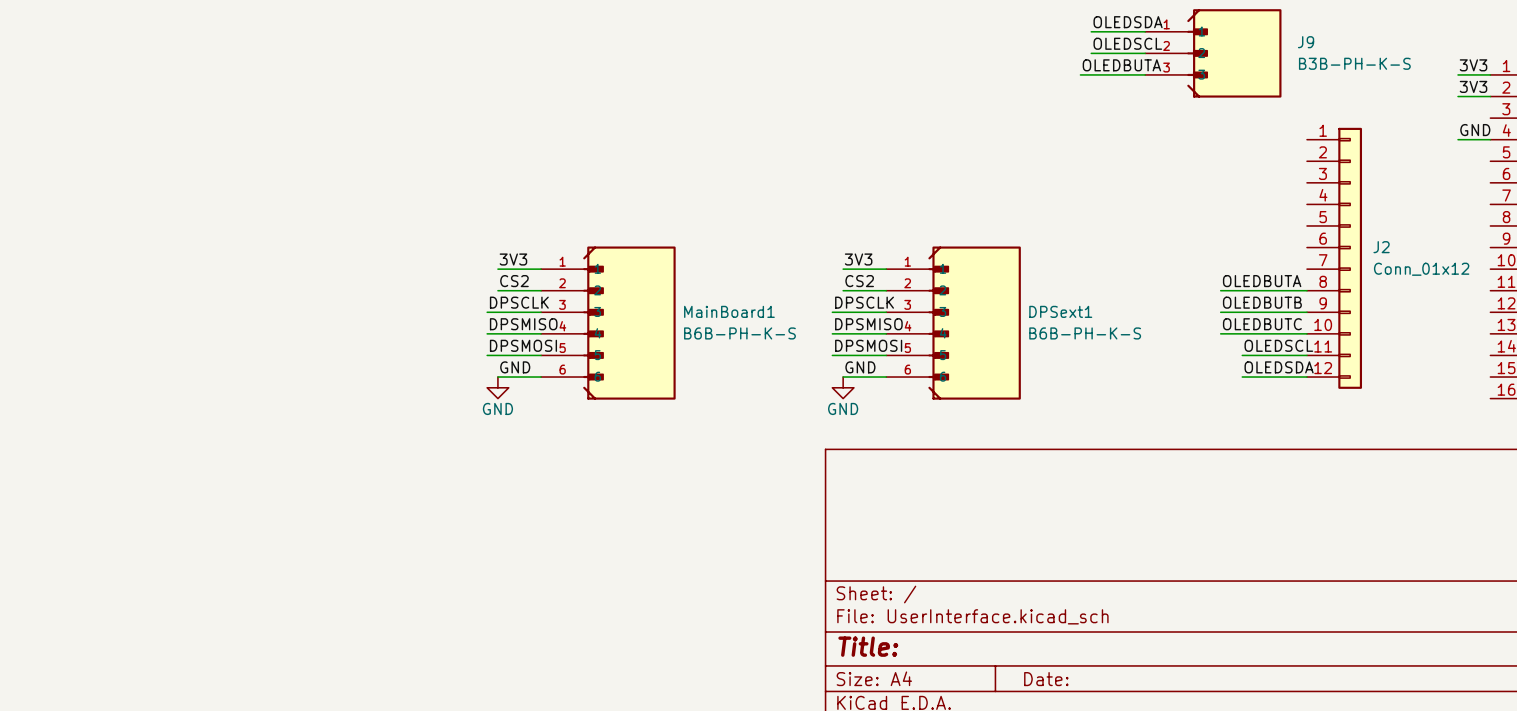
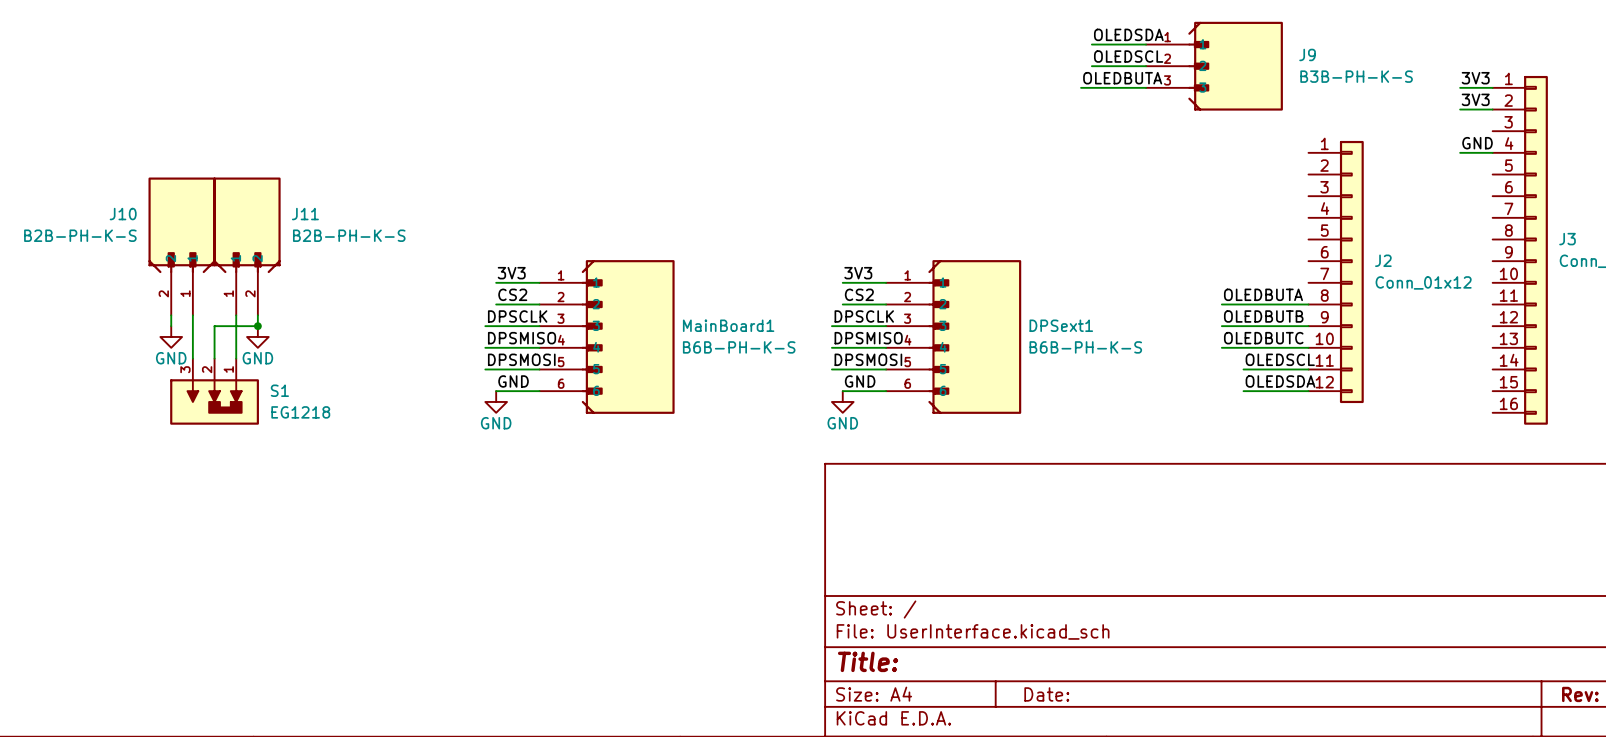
J10: none -> B2B-PH-K-S (182, 246)
J11: none -> B2B-PH-K-S (247, 246)
wire: none -> (171, 315) (171, 326)
wire: none -> (192, 315) (192, 358)
wire: none -> (236, 315) (236, 358)
wire: none -> (257, 315) (257, 326) (214, 326) (214, 358)
junction: none -> (257, 326)
power symbol: none -> GND (171, 336)
power symbol: none -> GND (257, 336)
S1: none -> EG1218 (214, 391)

